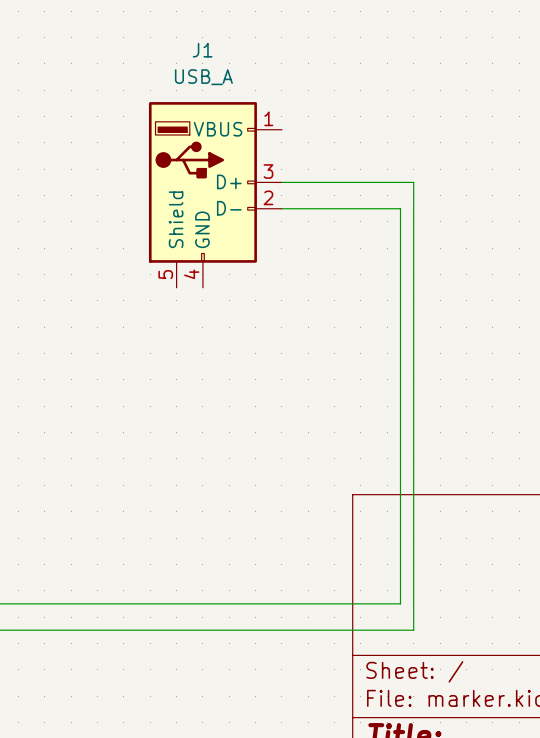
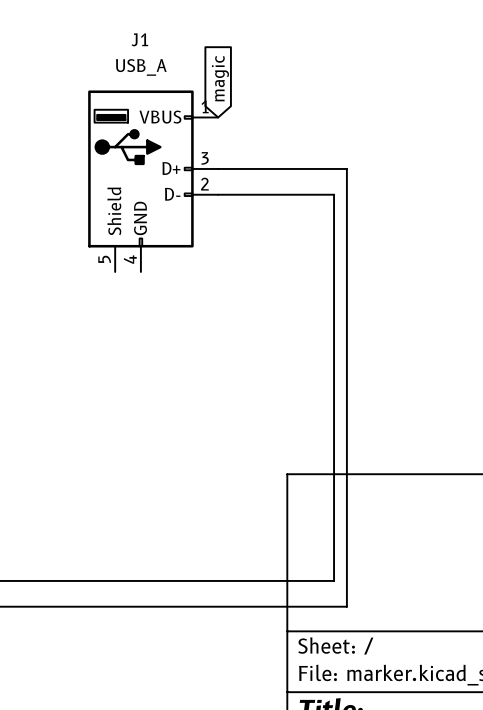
global label: none -> magic (220, 78)

